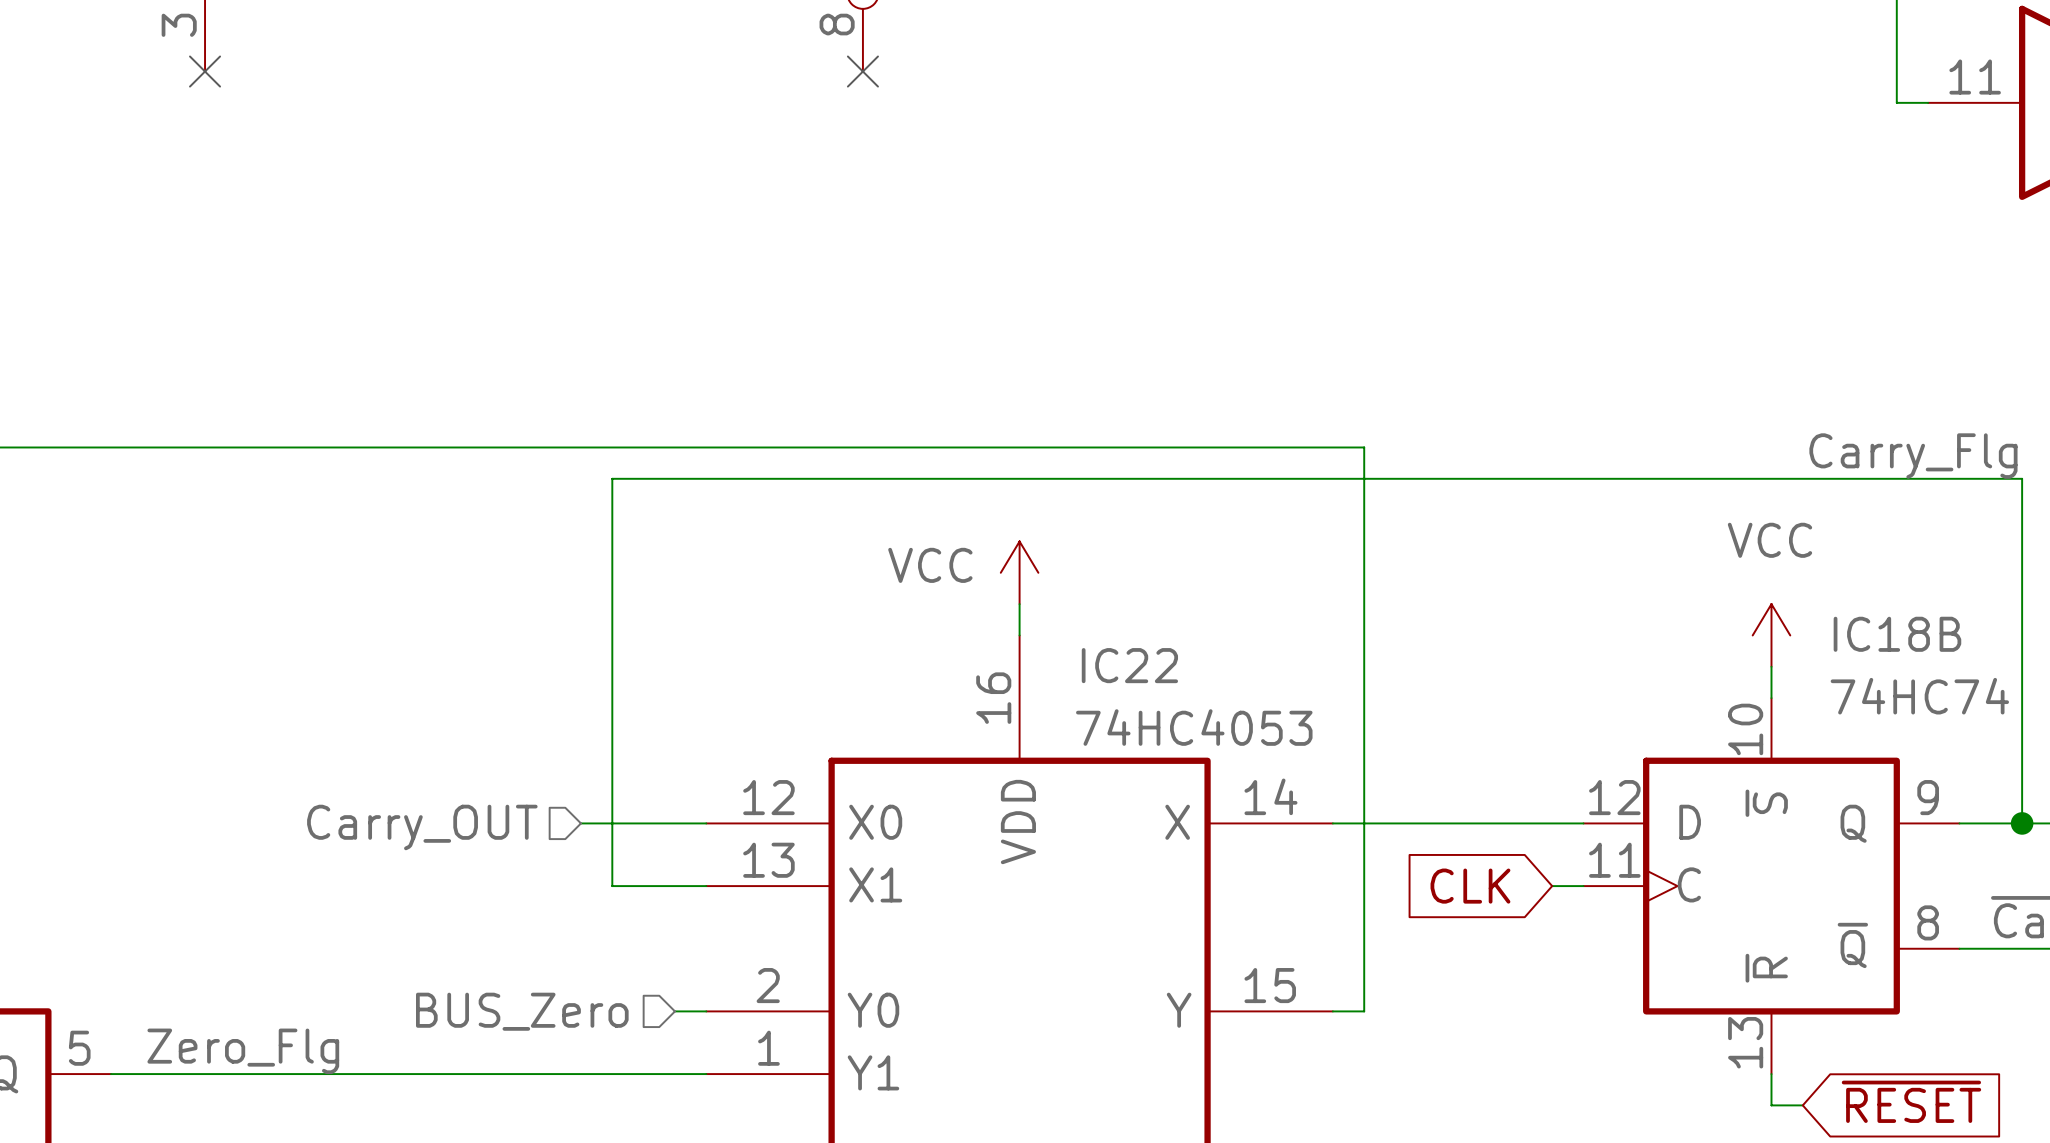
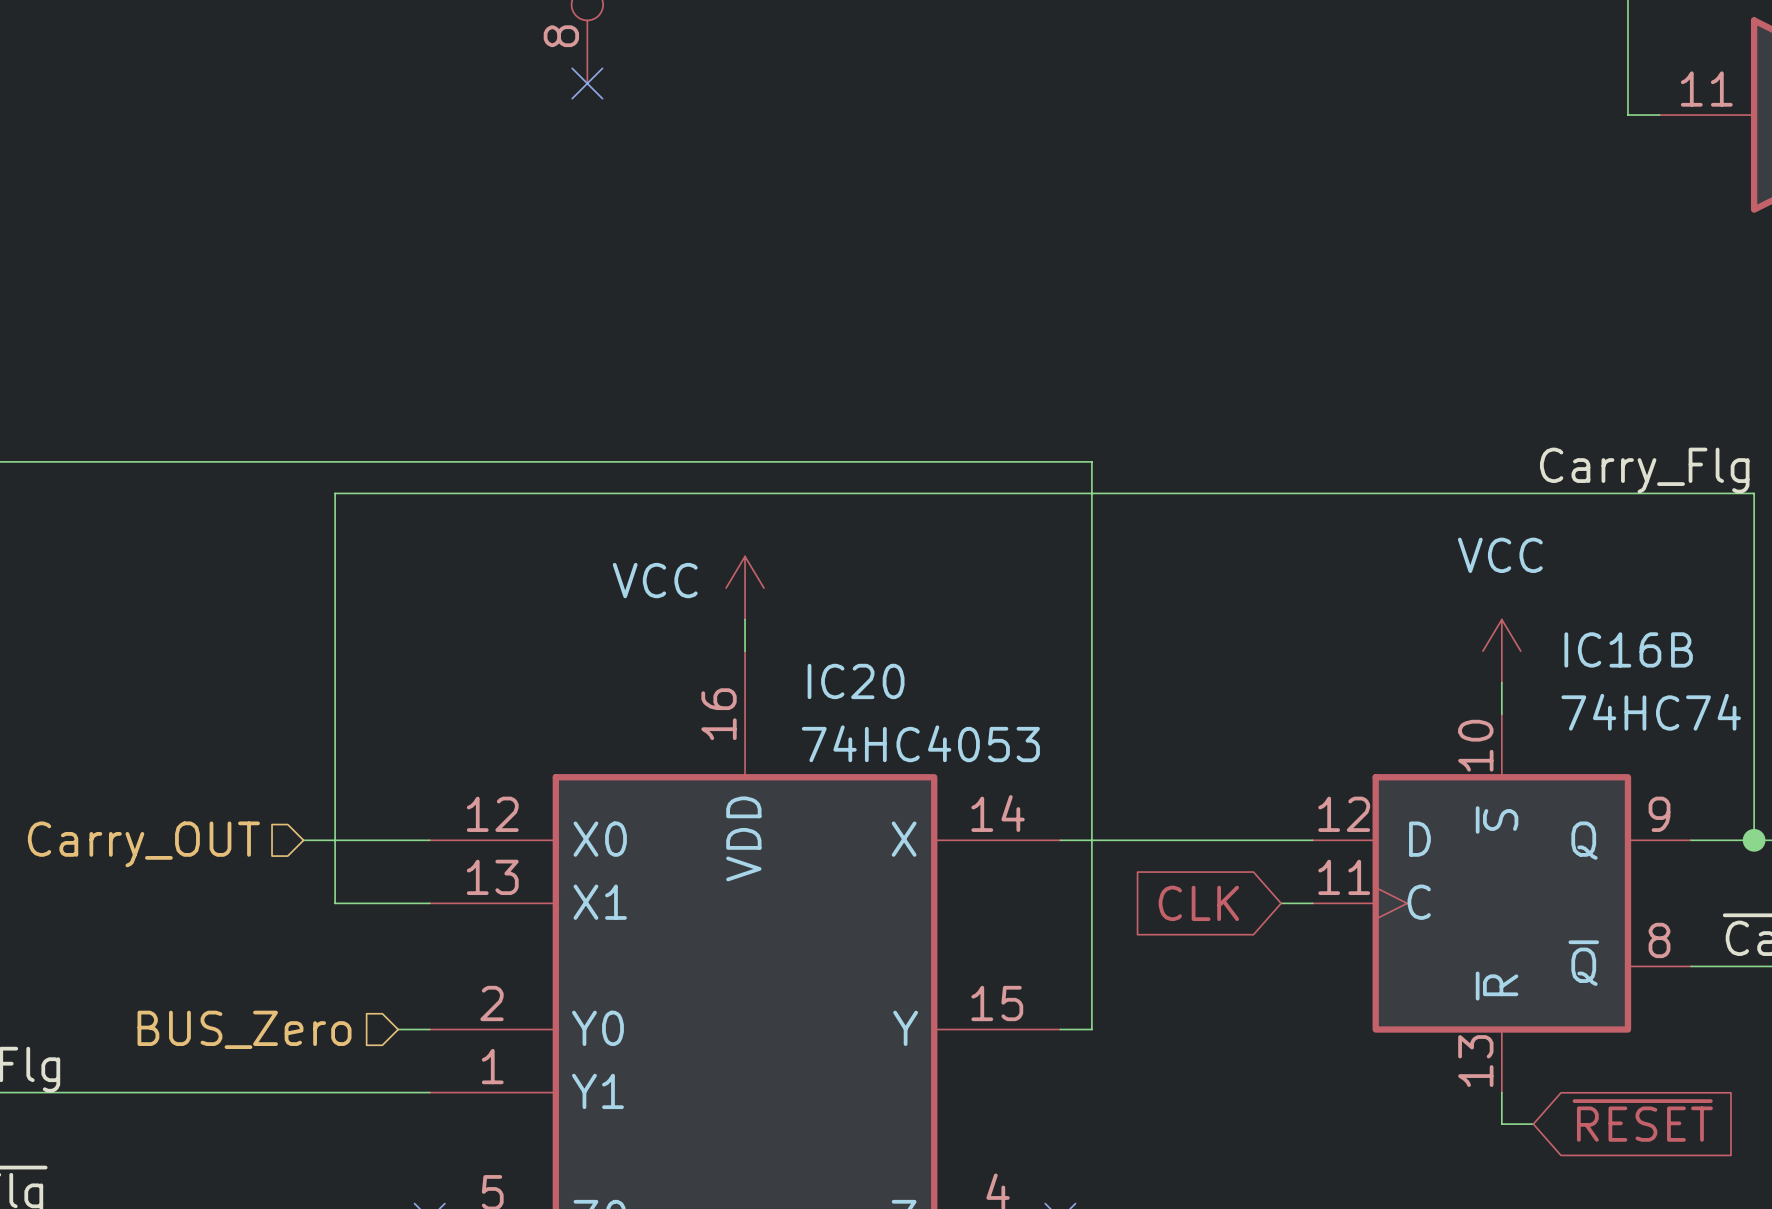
IC18B name: IC18B (1897, 634) -> IC16B (1628, 649)
IC22 name: IC22 (1129, 665) -> IC20 (856, 681)

